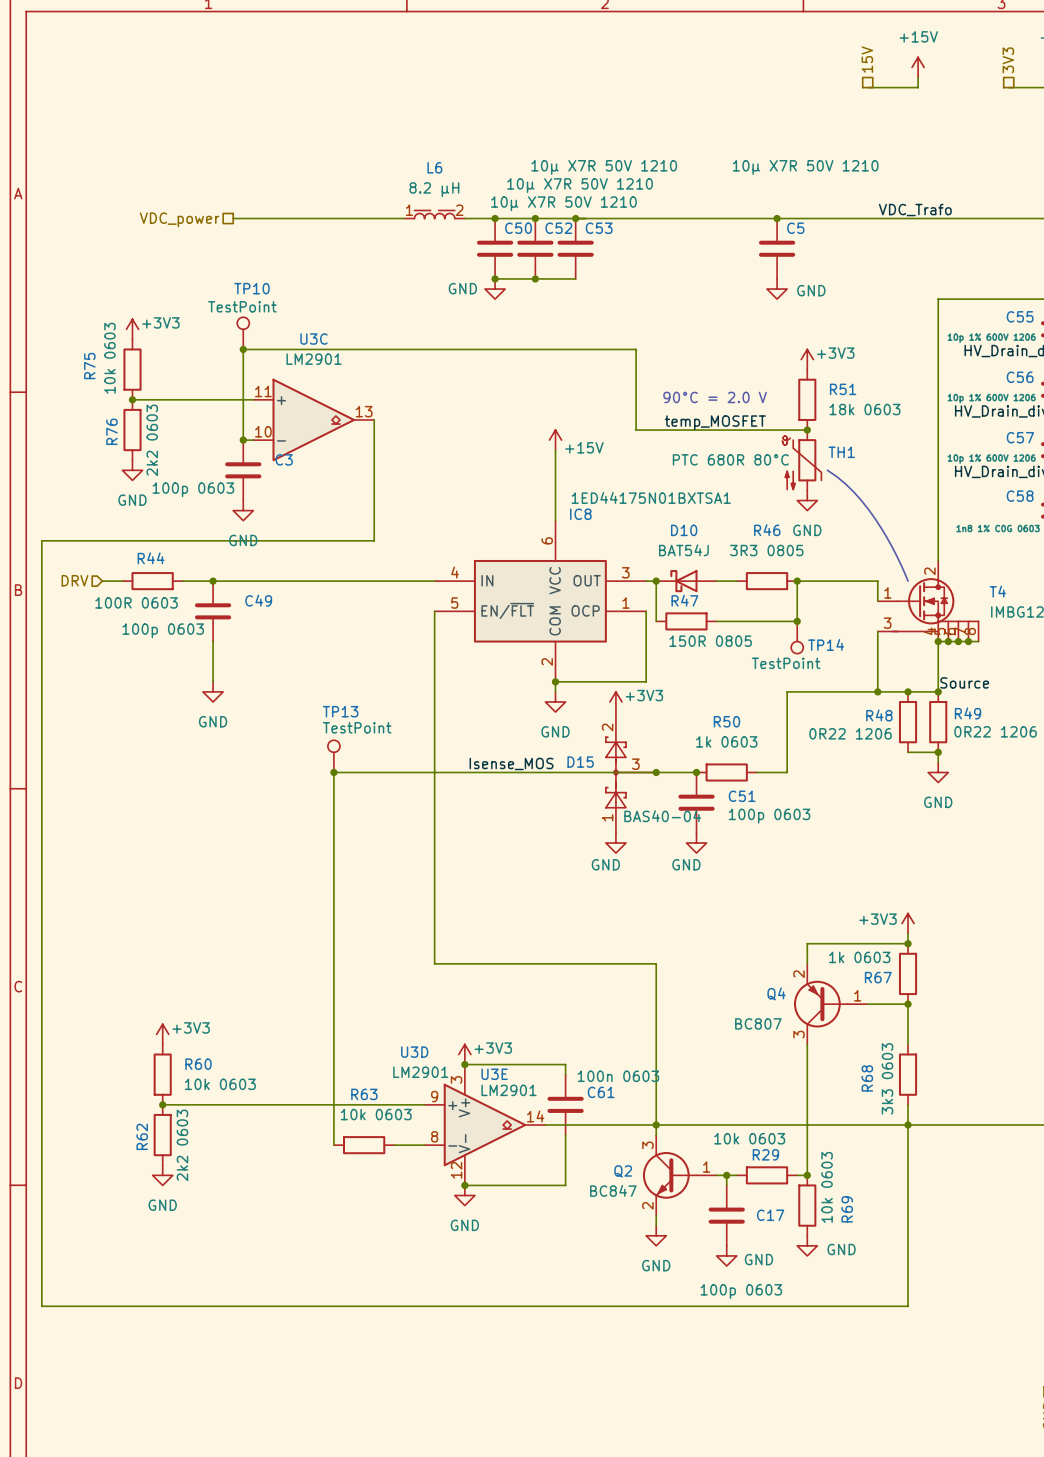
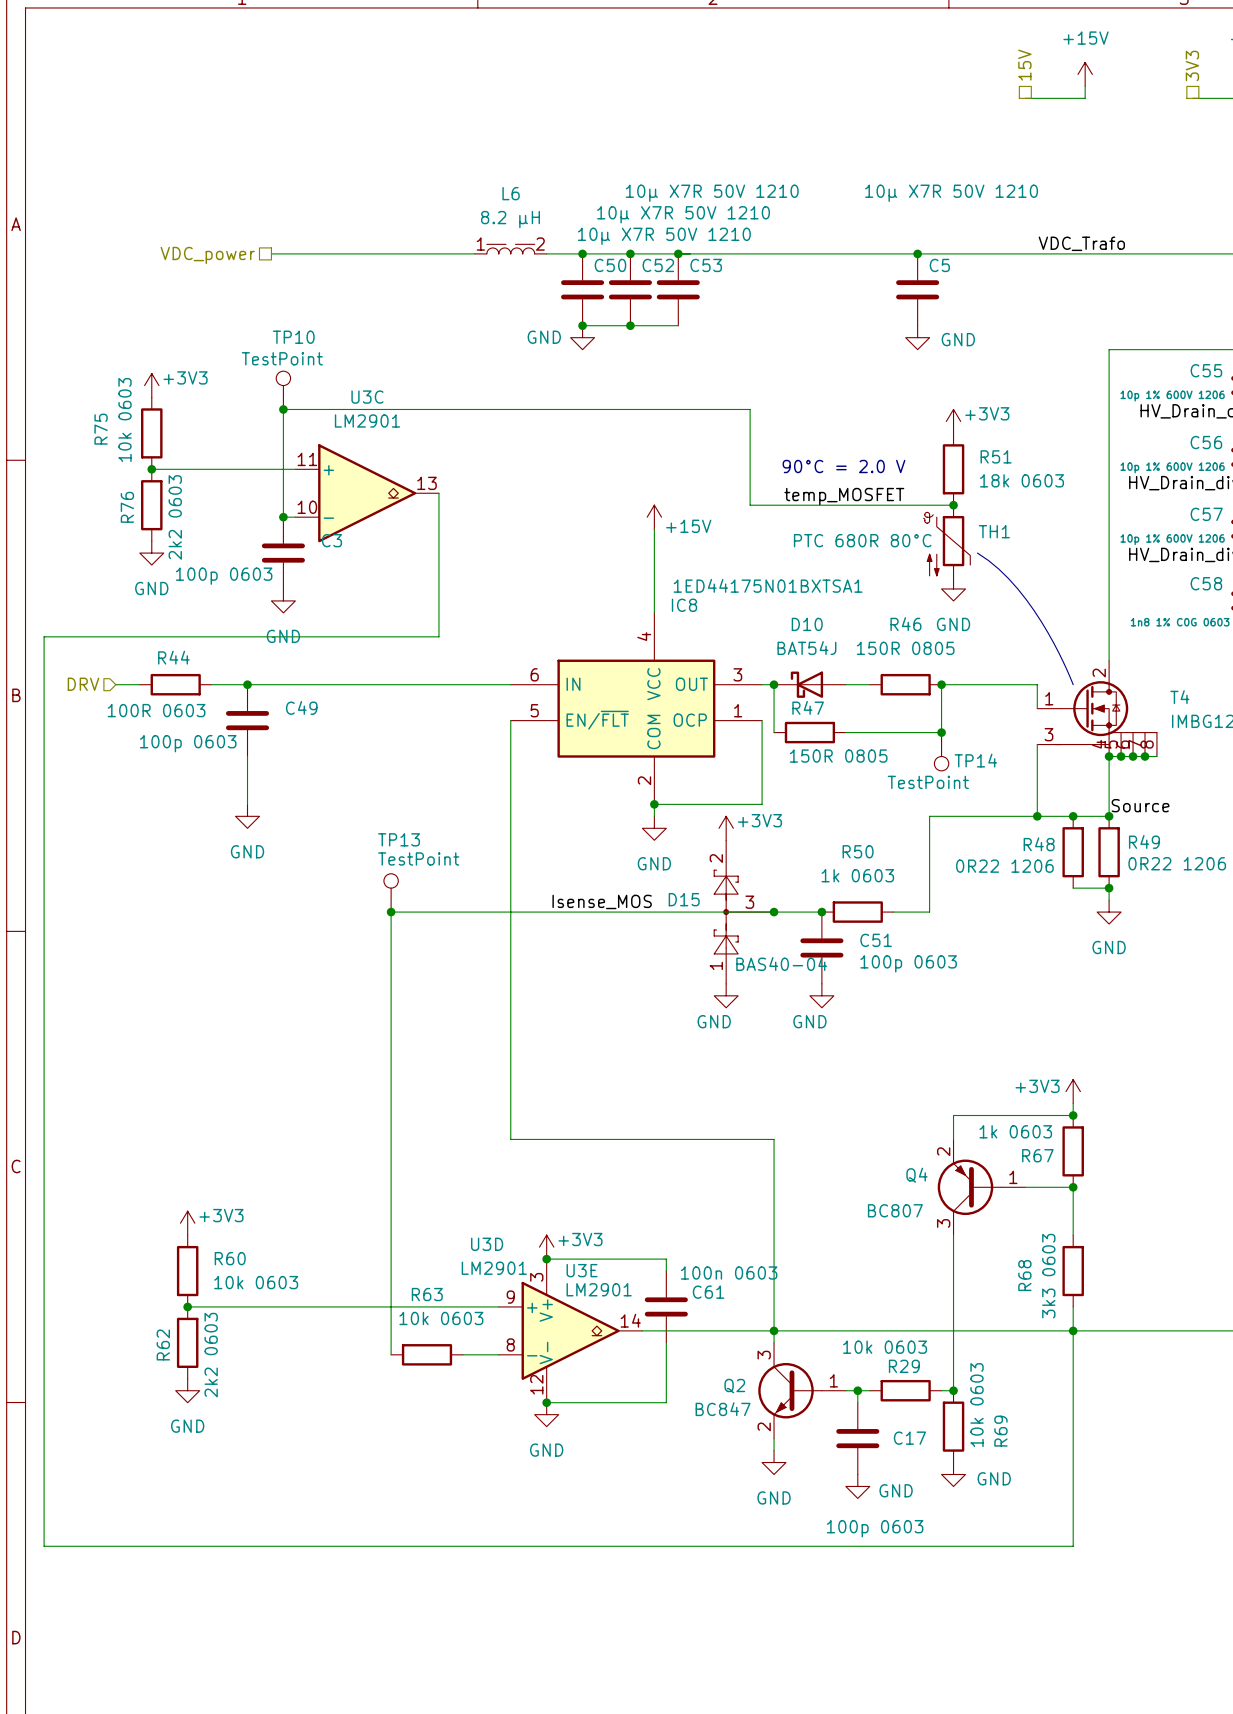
IC8 pin number: 6 (547, 540) -> 4 (644, 636)
R46 value: 3R3 0805 (766, 550) -> 150R 0805 (905, 648)
IC8 pin number: 4 (455, 572) -> 6 (534, 674)

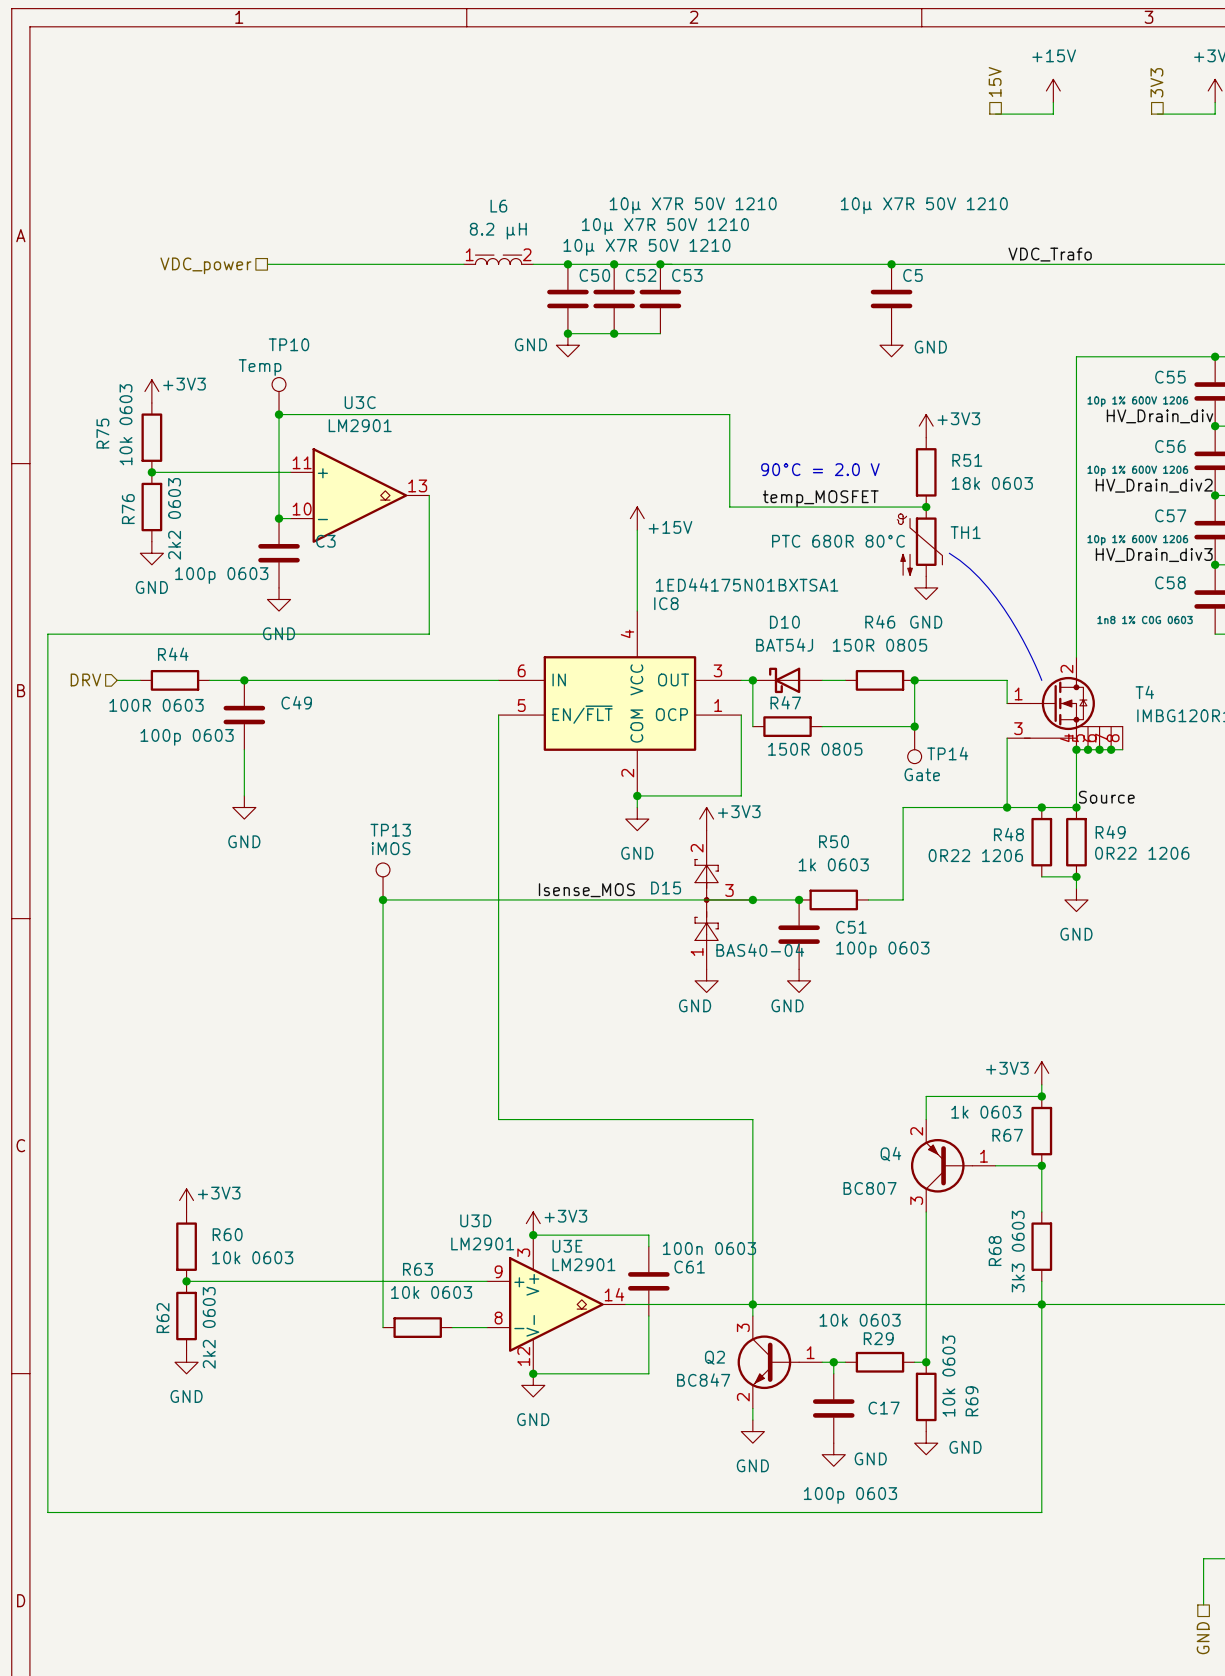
TP10 value: TestPoint (282, 358) -> Temp (260, 367)
TP14 value: TestPoint (928, 782) -> Gate (922, 774)
TP13 value: TestPoint (418, 858) -> iMOS (390, 848)

